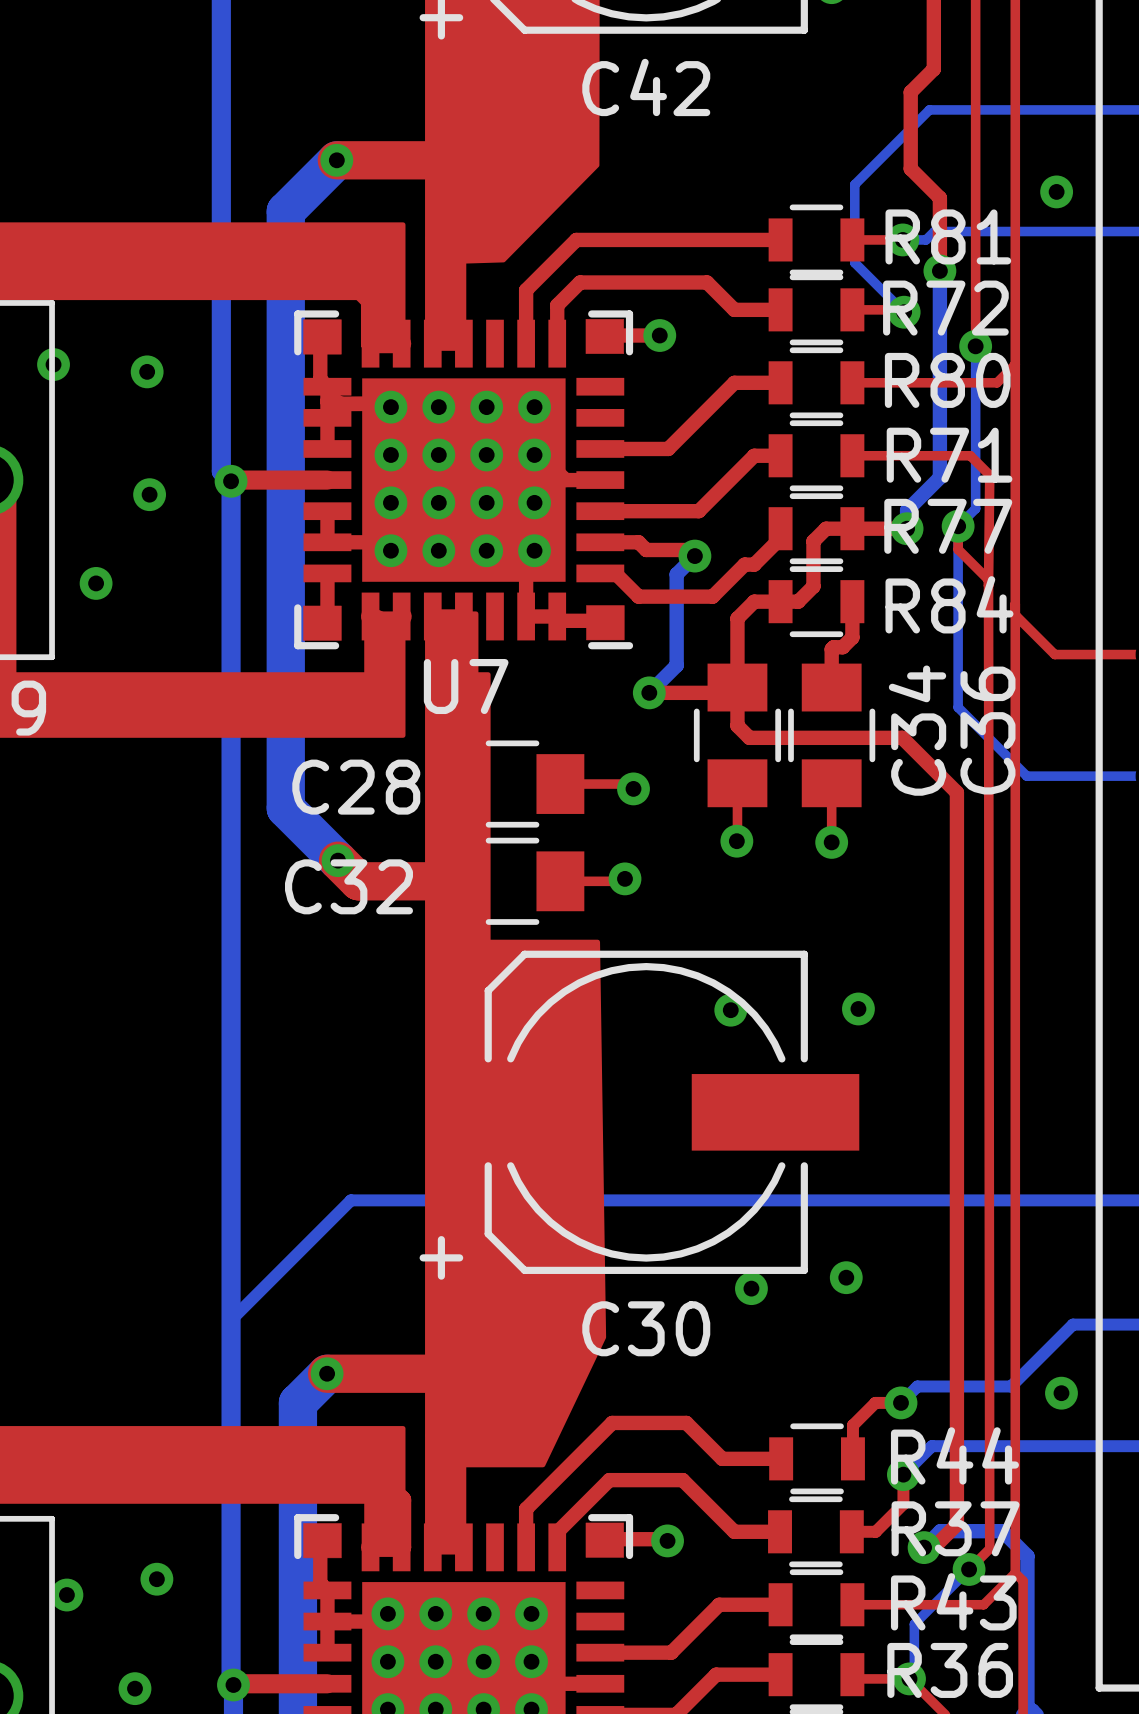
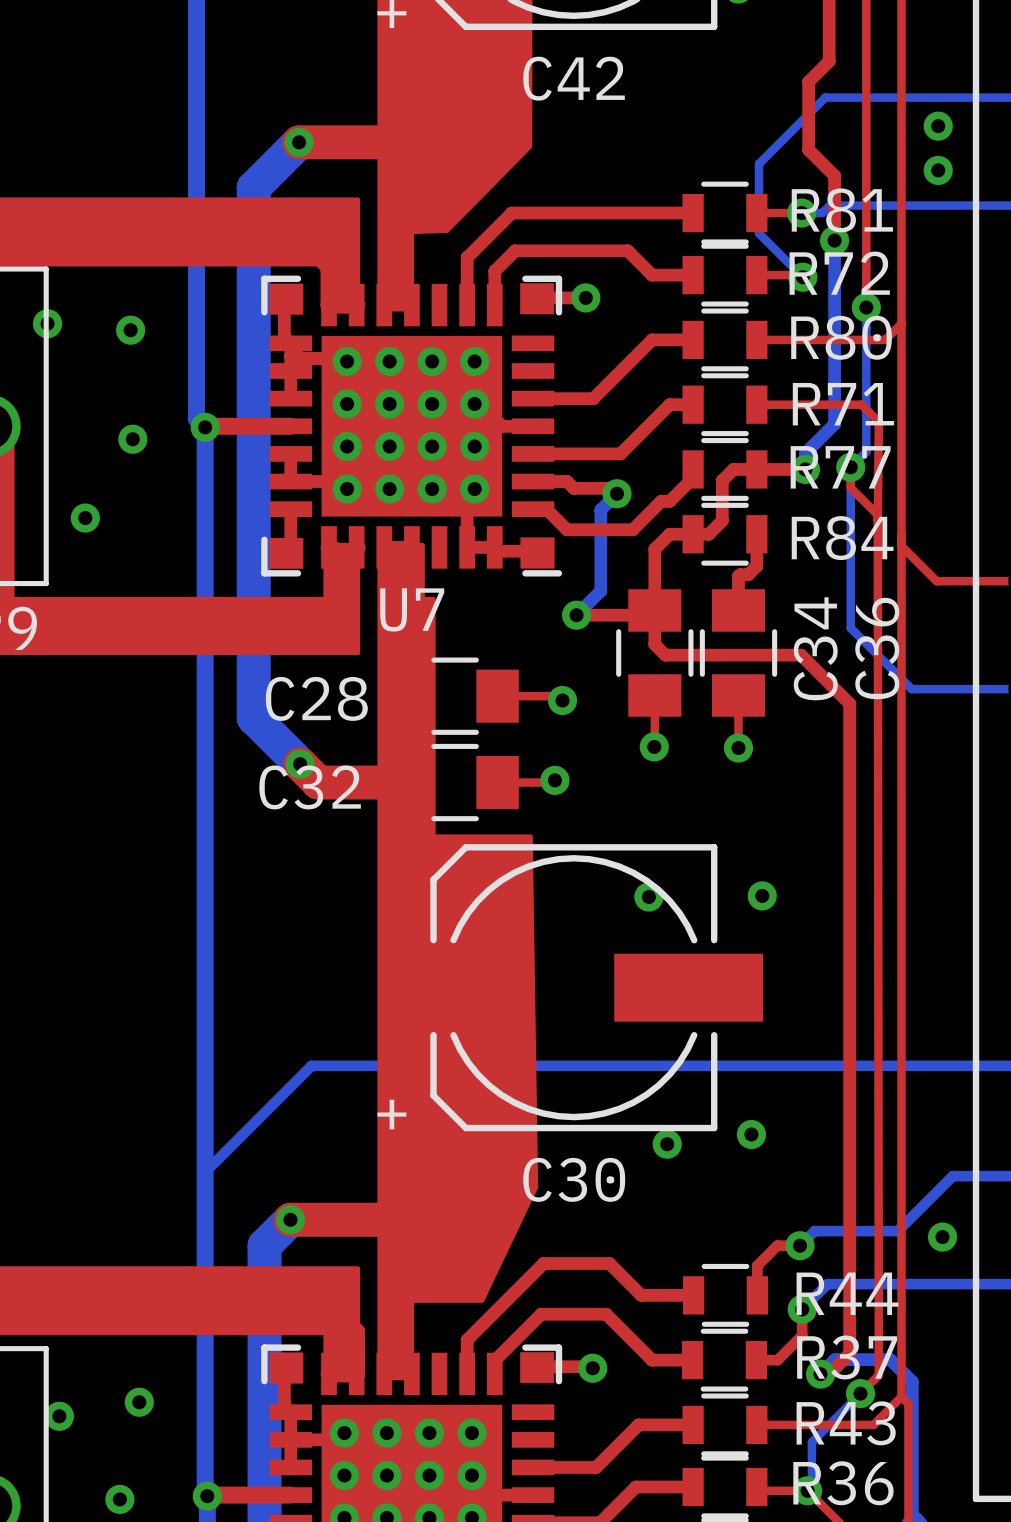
via: none -> (938, 126)

